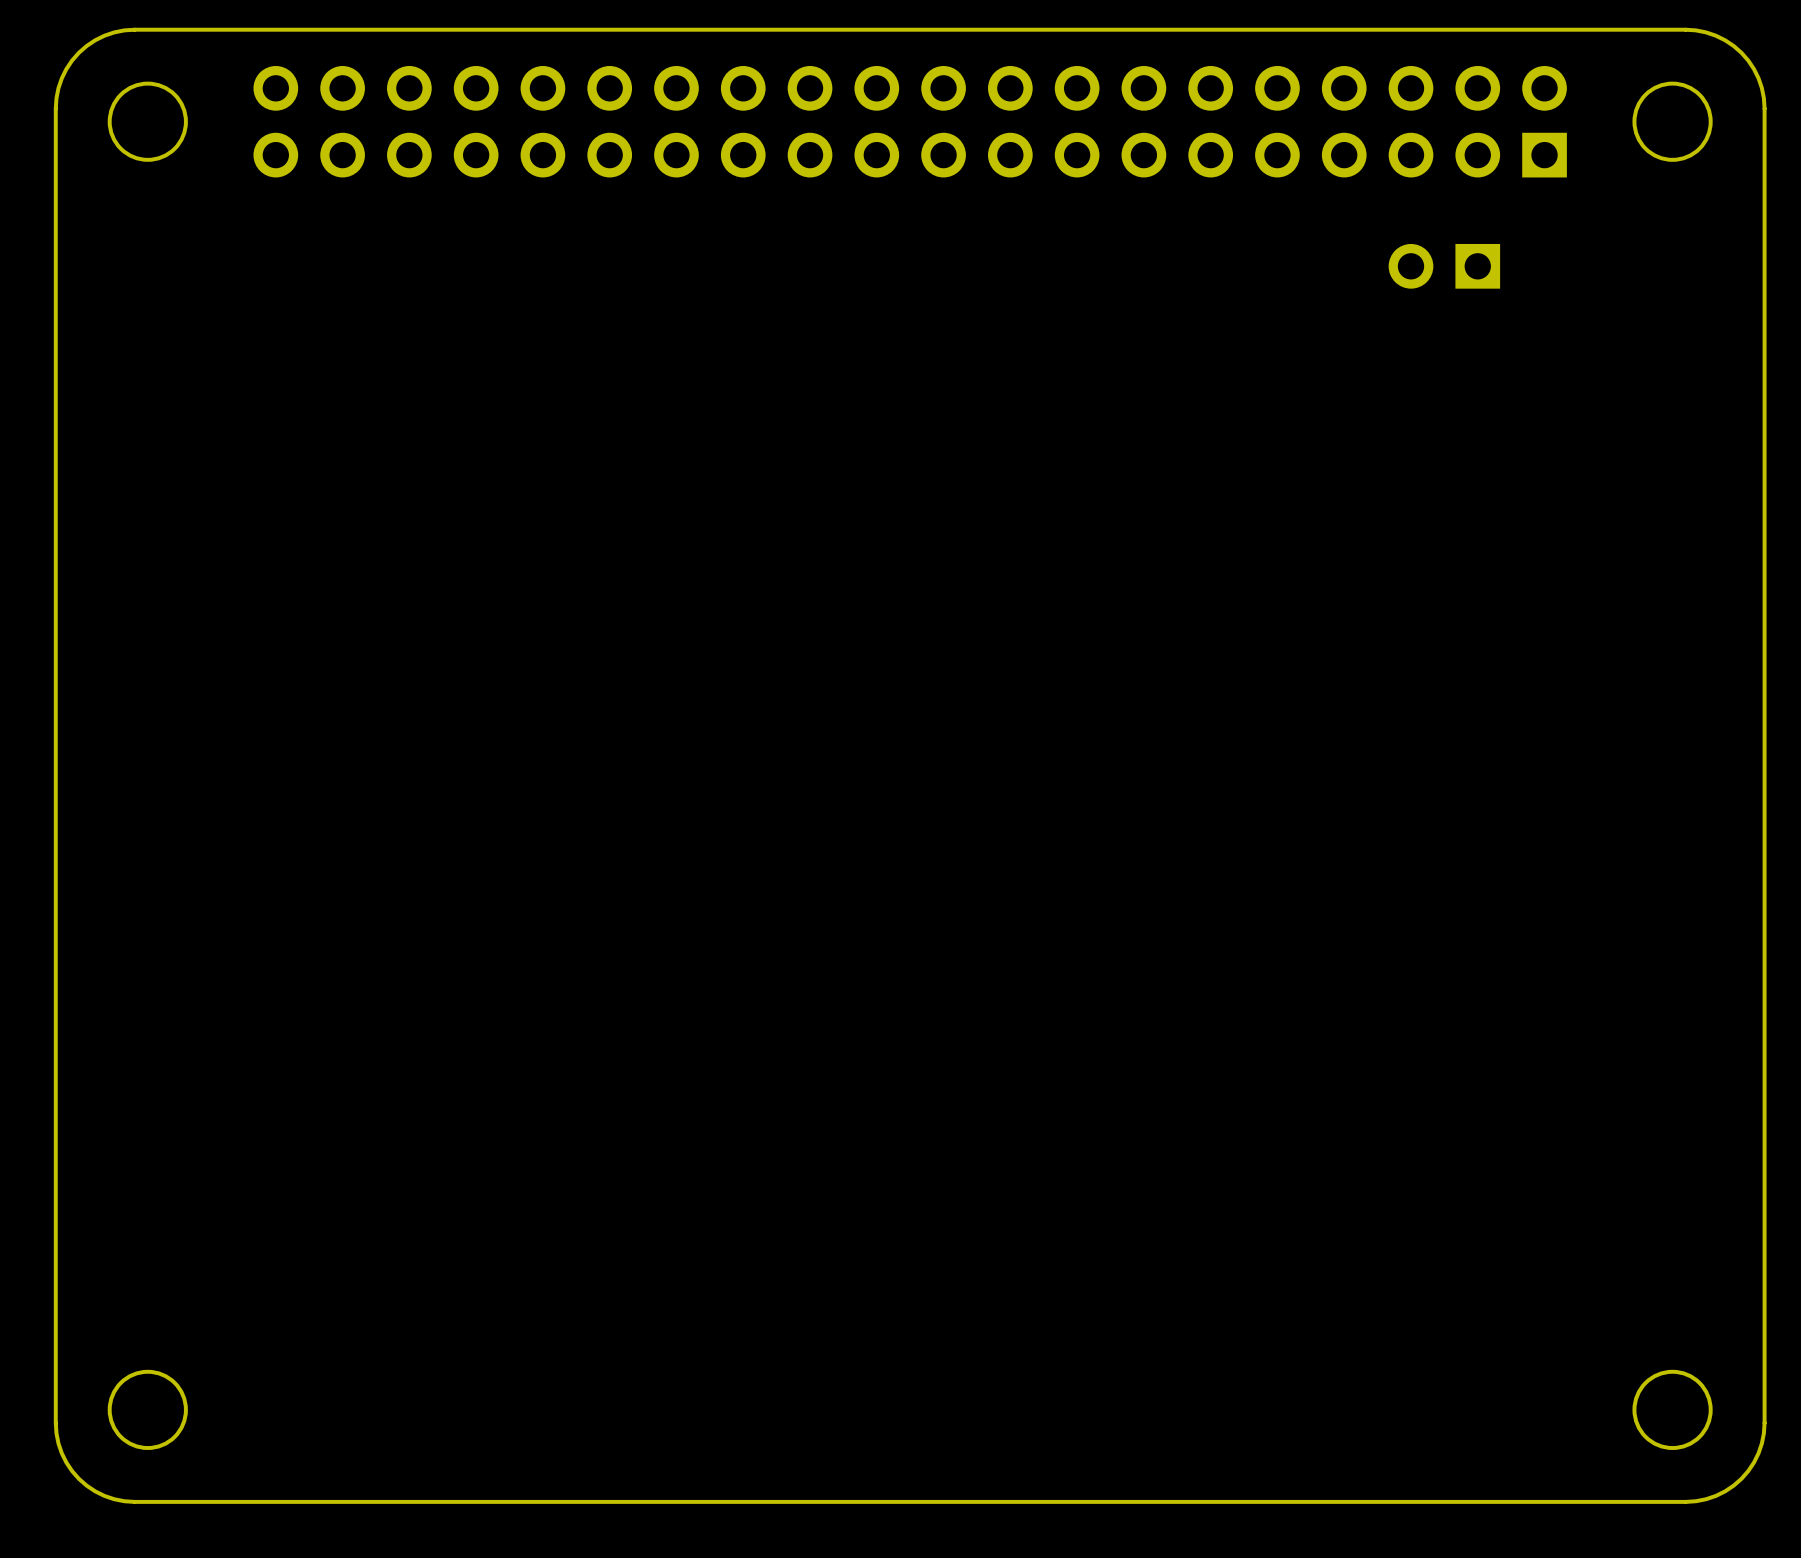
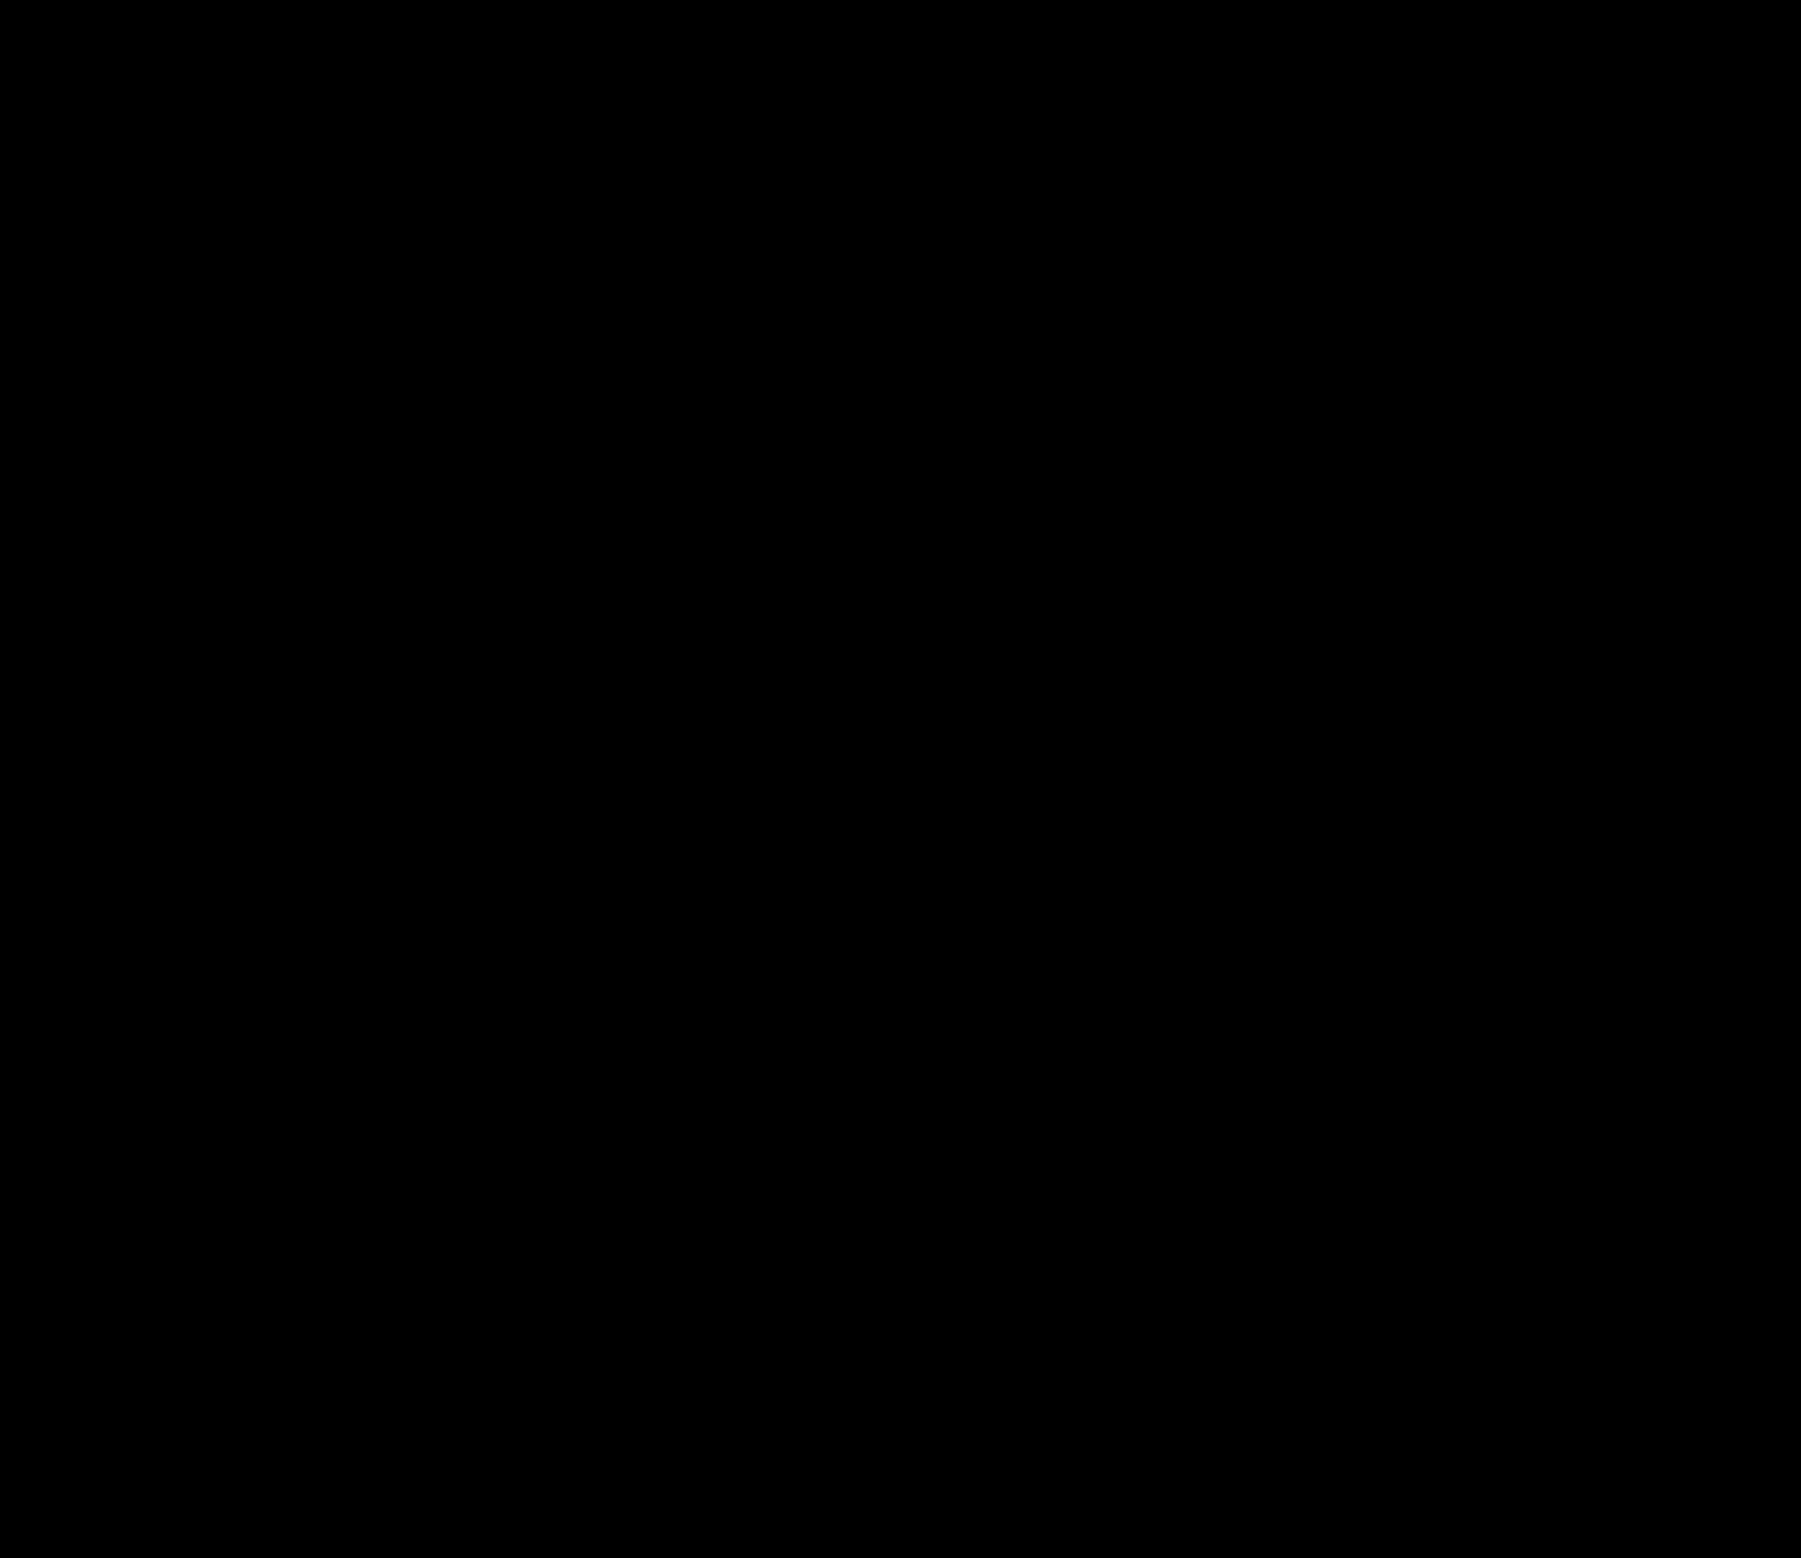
board edge: (1685, 29) (134, 29) (104, 35) (78, 52) (61, 78) (55, 108) (55, 1423) (61, 1453) (78, 1478) (104, 1495) (134, 1501) (1685, 1501) (1715, 1495) (1741, 1478) (1758, 1453) (1764, 1423) (1764, 108) (1758, 78) (1741, 52) (1715, 35) (1685, 29) -> none
round board edge: [107, 81, 188, 162] -> none
round board edge: [1632, 81, 1713, 162] -> none
part: (910, 121) -> none
part: (1444, 266) -> none
round board edge: [107, 1369, 188, 1450] -> none
round board edge: [1632, 1369, 1713, 1450] -> none

